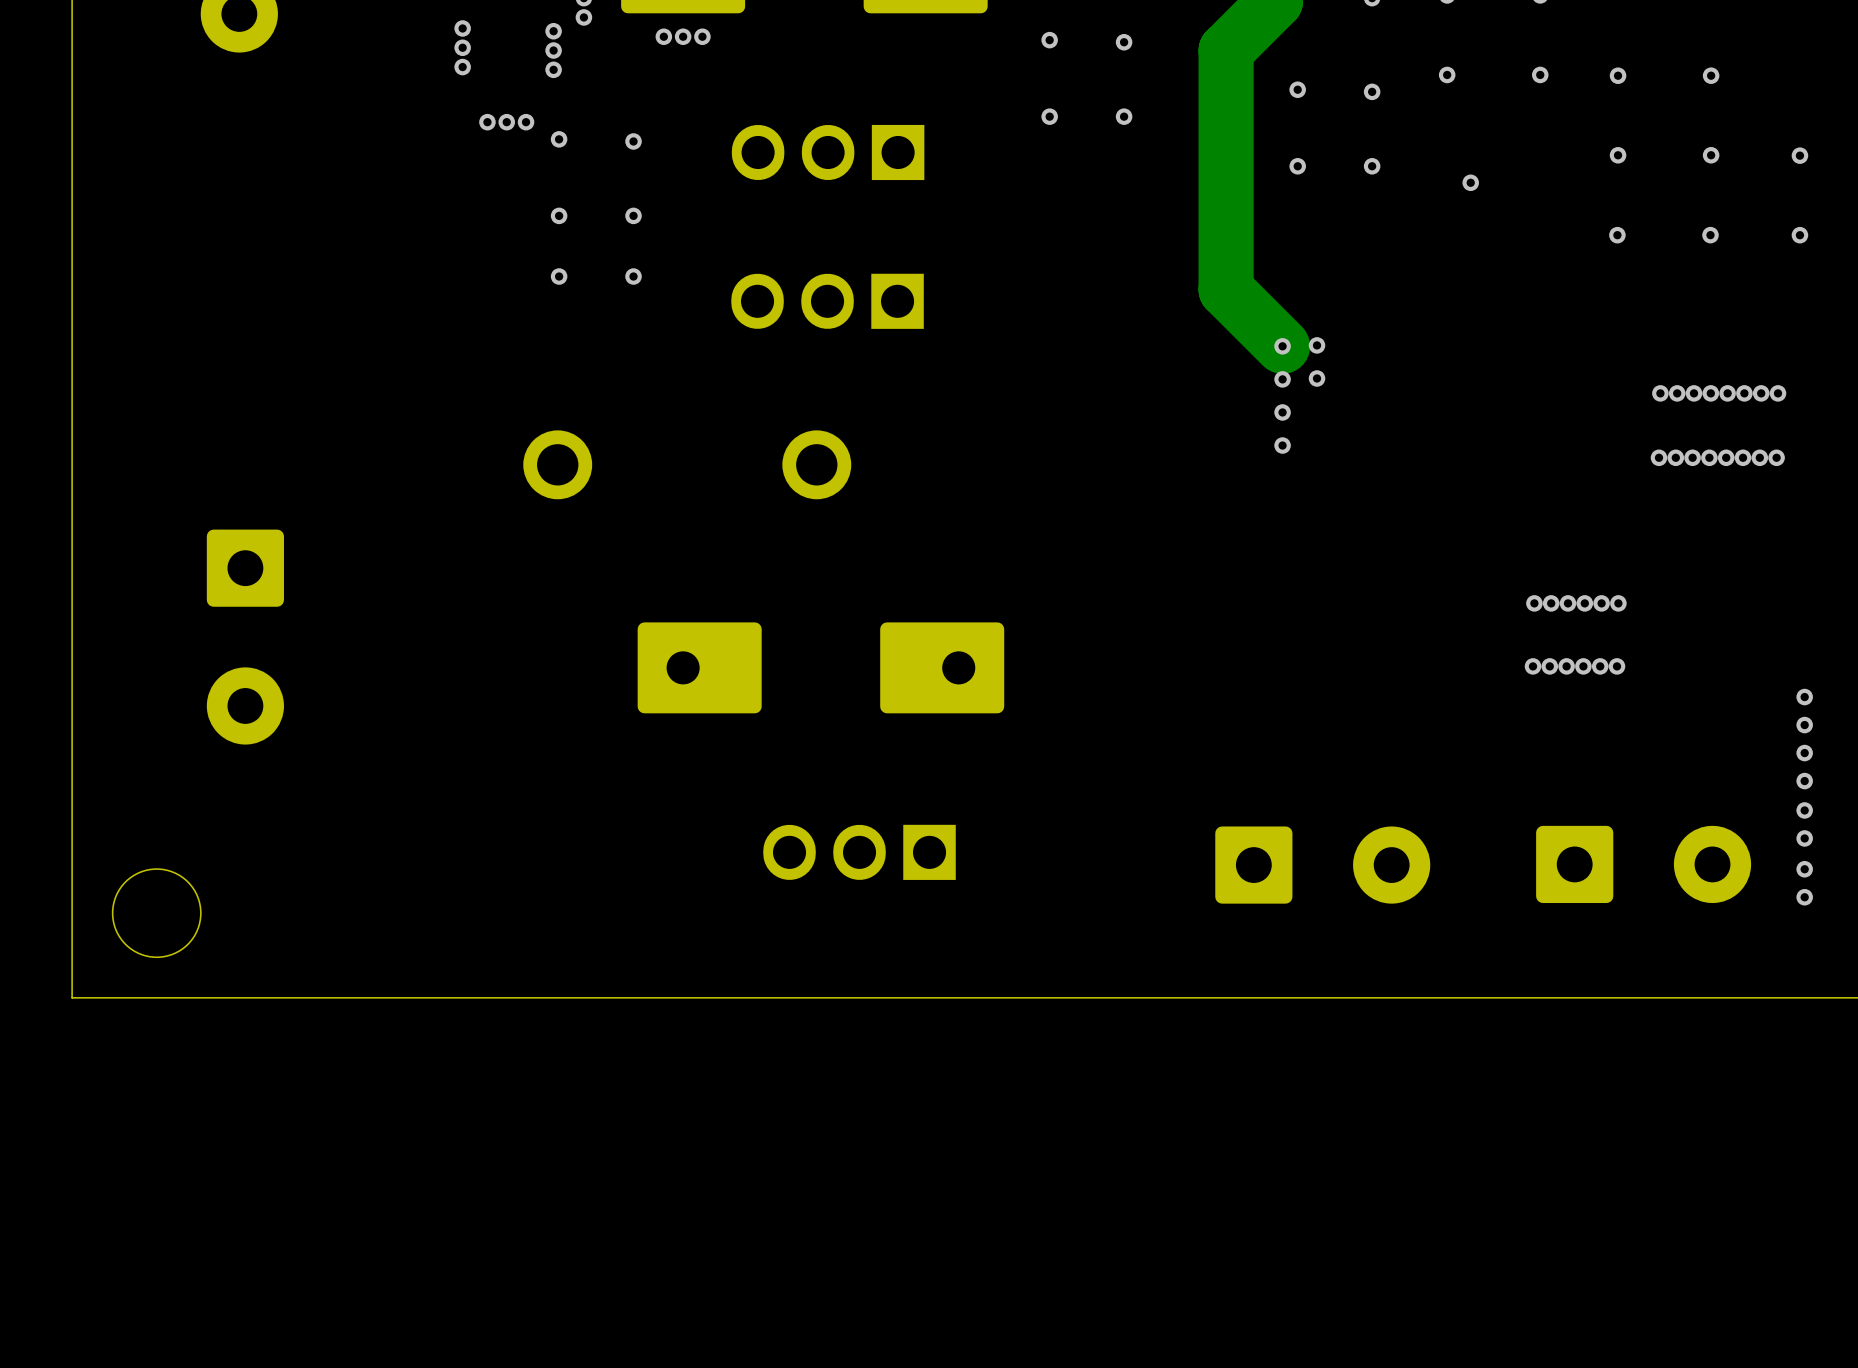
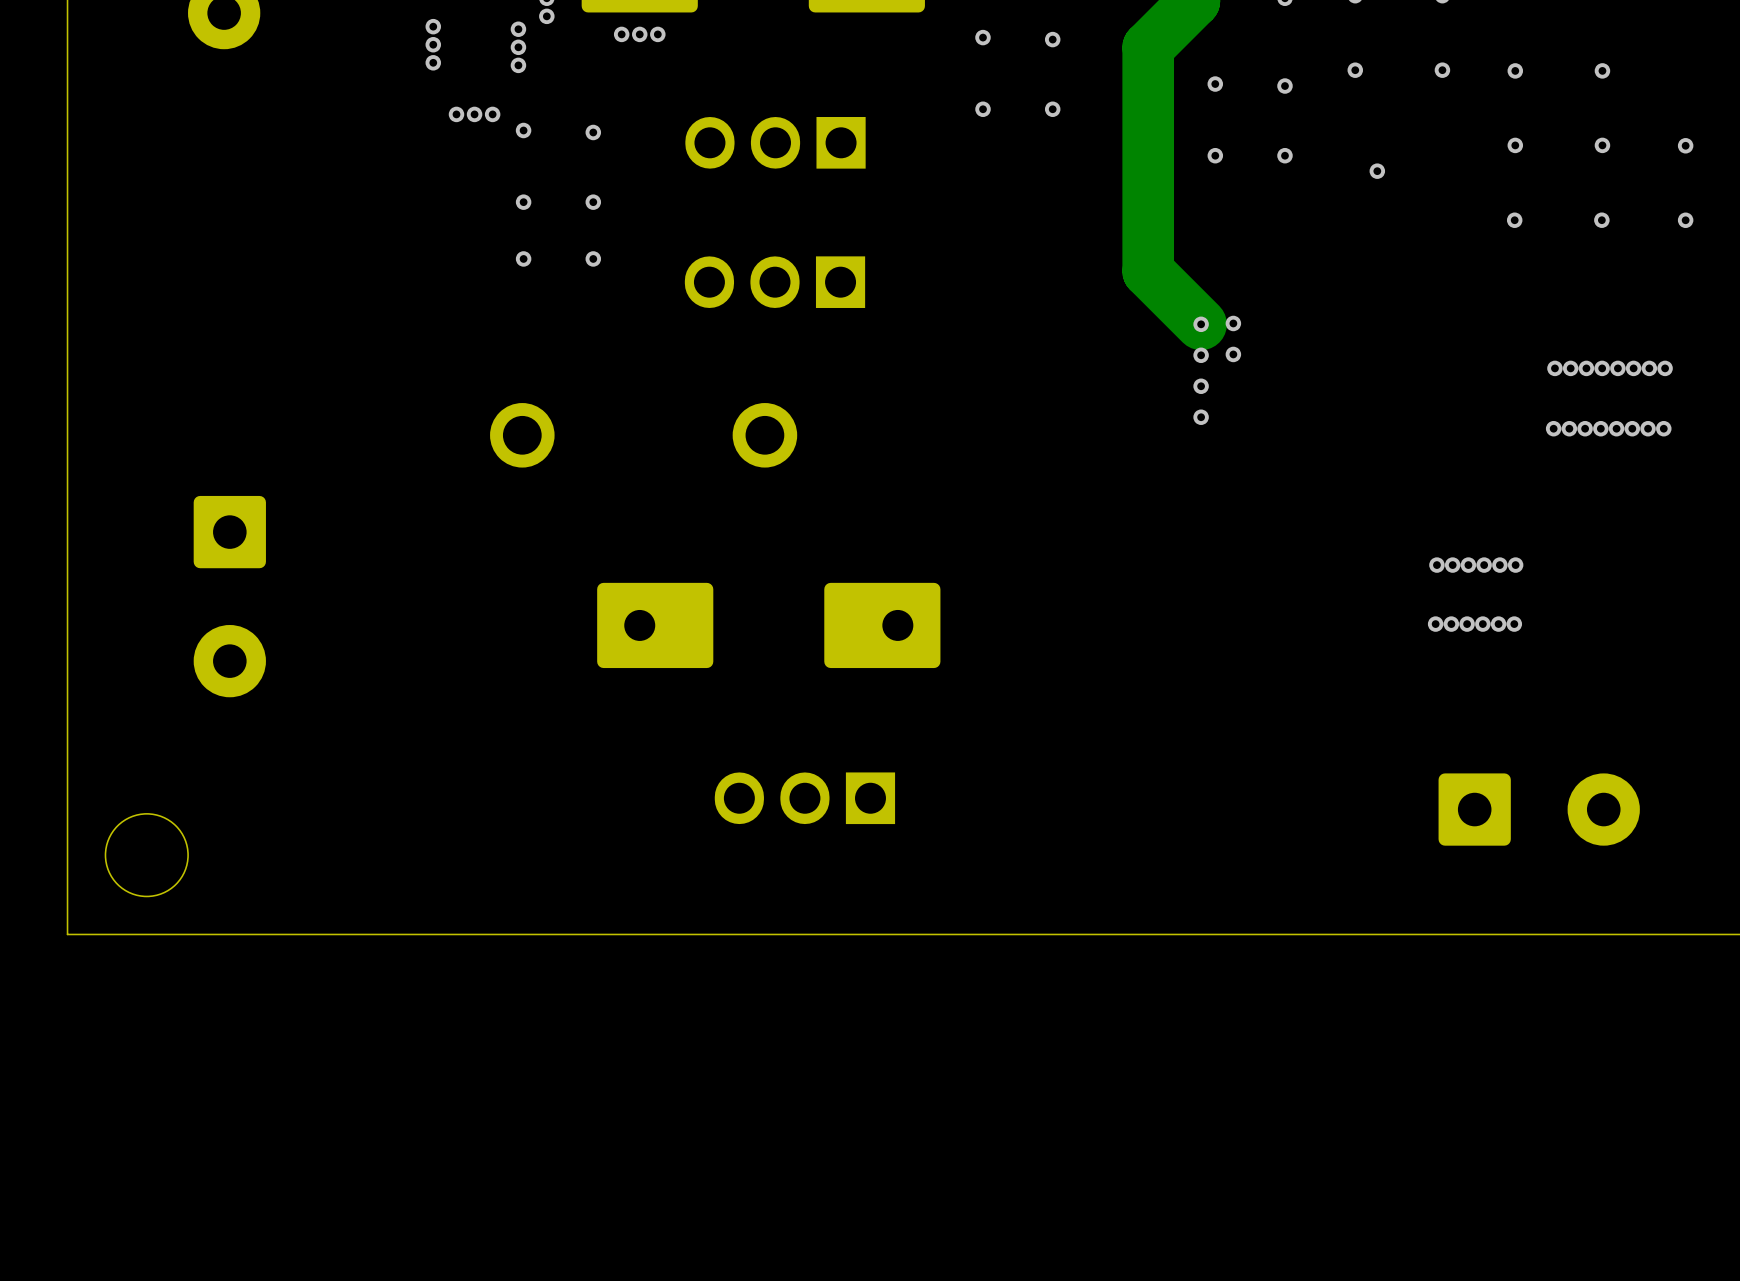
via: (1804, 697) -> none
via: (1804, 725) -> none
via: (1804, 753) -> none
via: (1804, 781) -> none
via: (1804, 810) -> none
via: (1804, 838) -> none
part: (1322, 865) -> none
via: (1804, 869) -> none
via: (1804, 897) -> none

